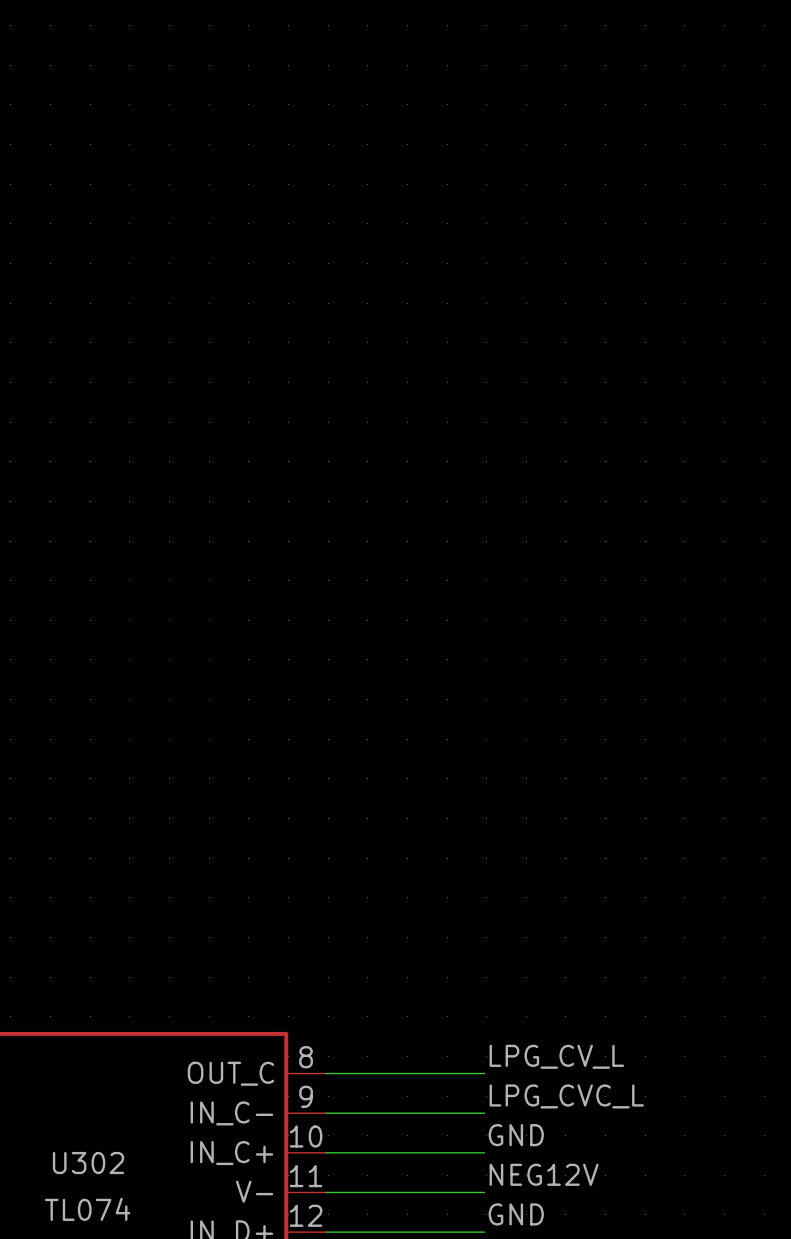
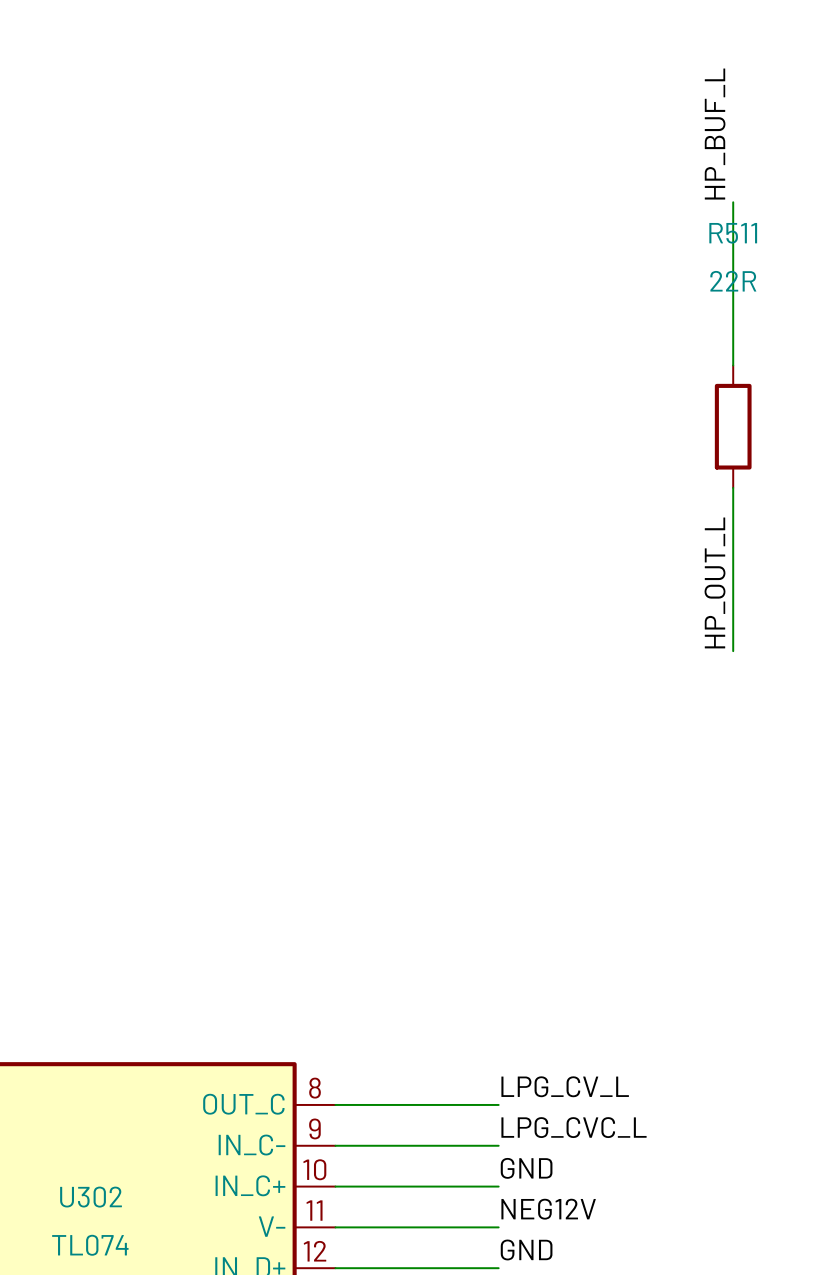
label: none -> HP_BUF_L (715, 134)
wire: none -> (733, 202) (733, 365)
R511: none -> 22R (733, 426)
wire: none -> (733, 487) (733, 651)
label: none -> HP_OUT_L (715, 582)

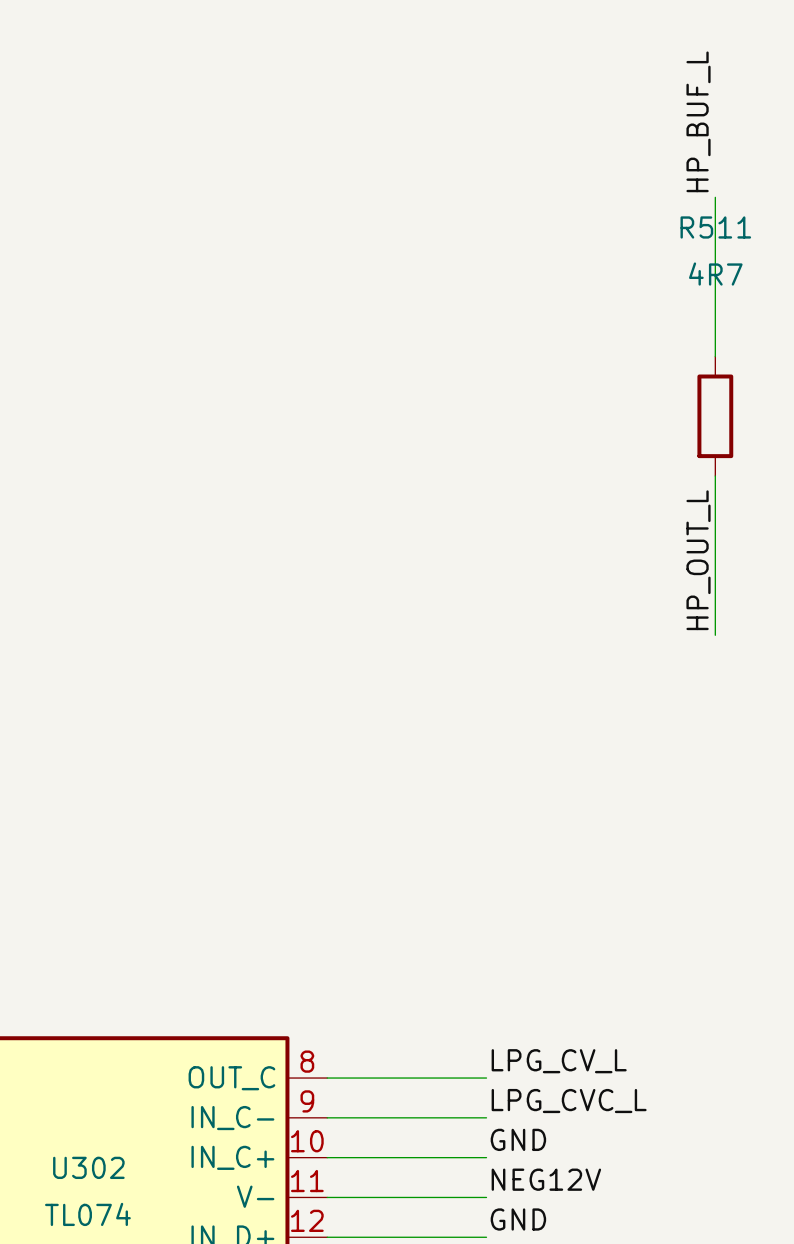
R511 value: 22R (733, 281) -> 4R7 (715, 274)

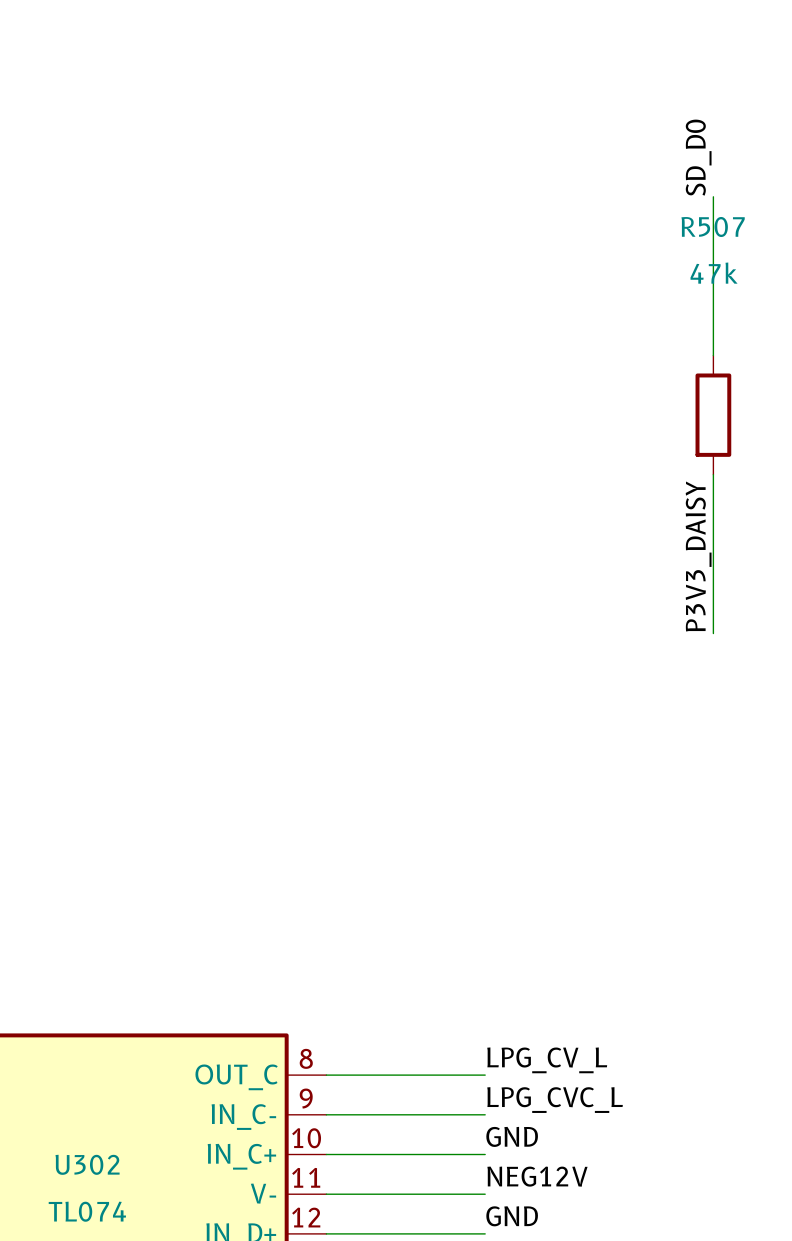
label: HP_BUF_L (698, 121) -> SD_D0 (698, 157)
R511 name: R511 (715, 227) -> R507 (713, 226)
R511 value: 4R7 (715, 274) -> 47k (714, 273)
label: HP_OUT_L (698, 560) -> P3V3_DAISY (698, 556)

